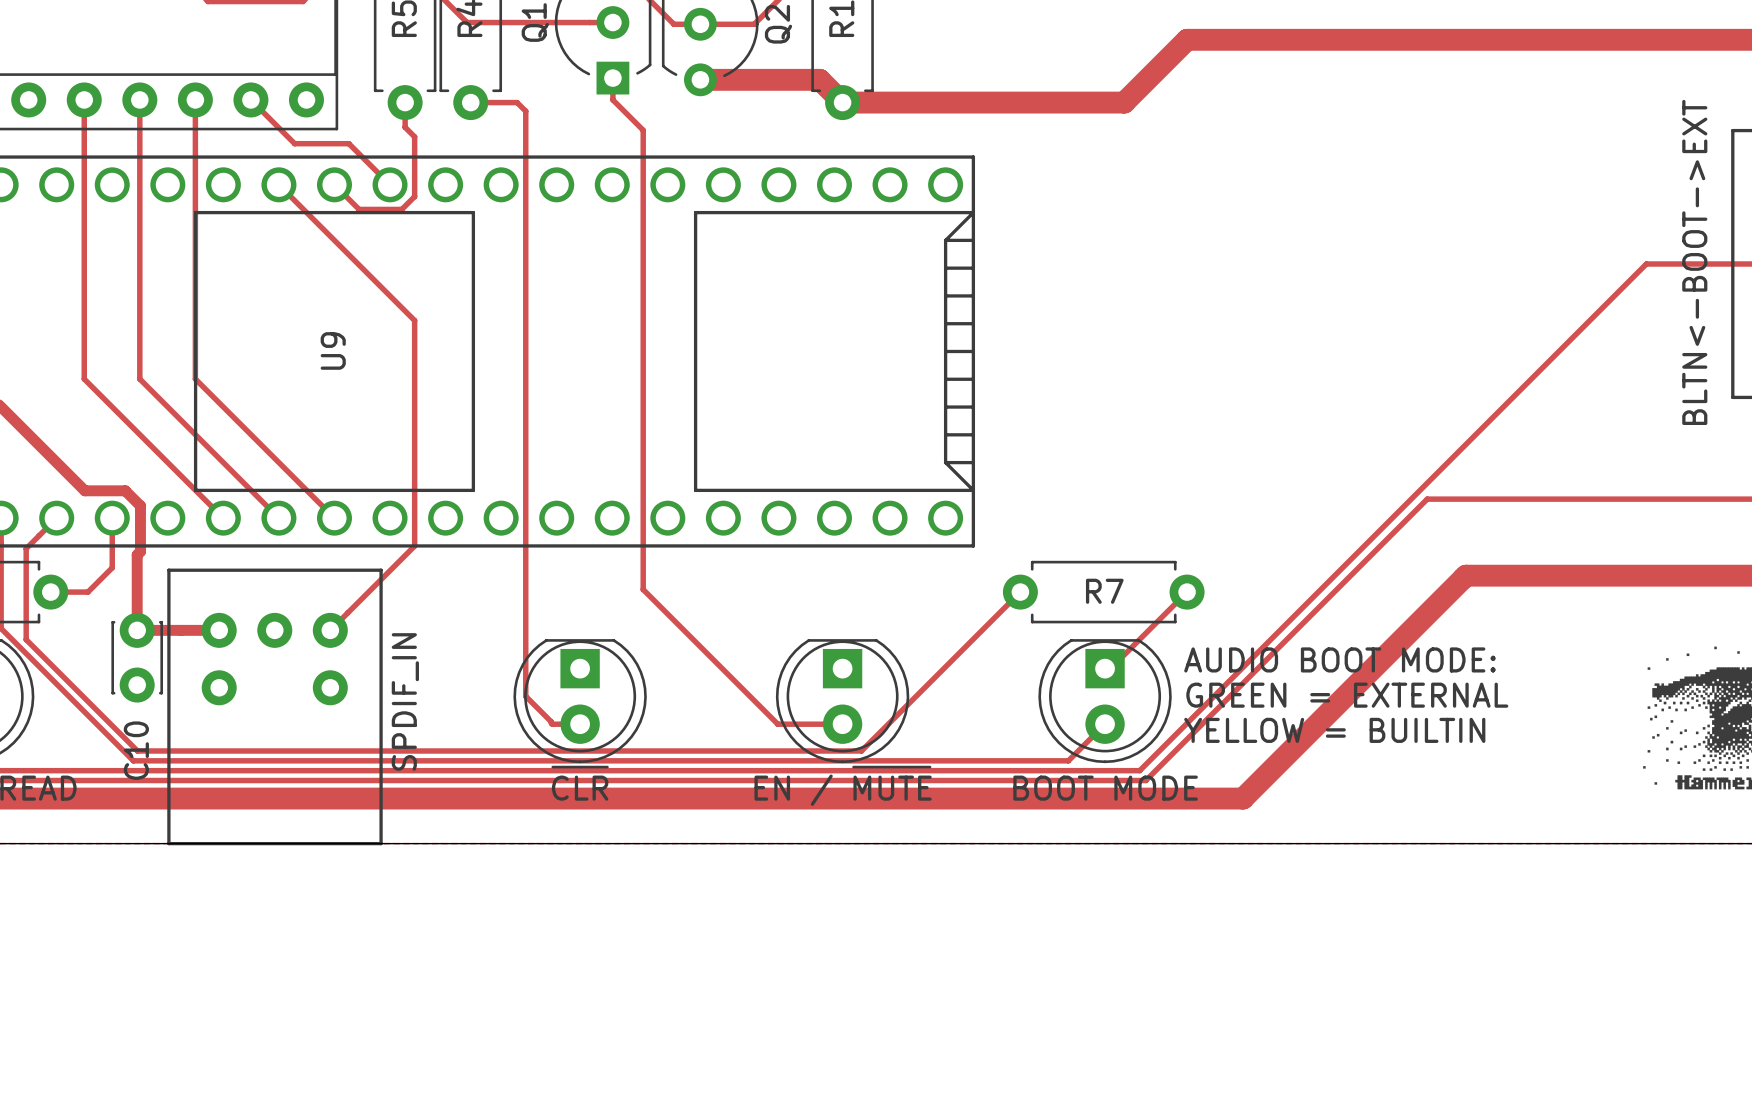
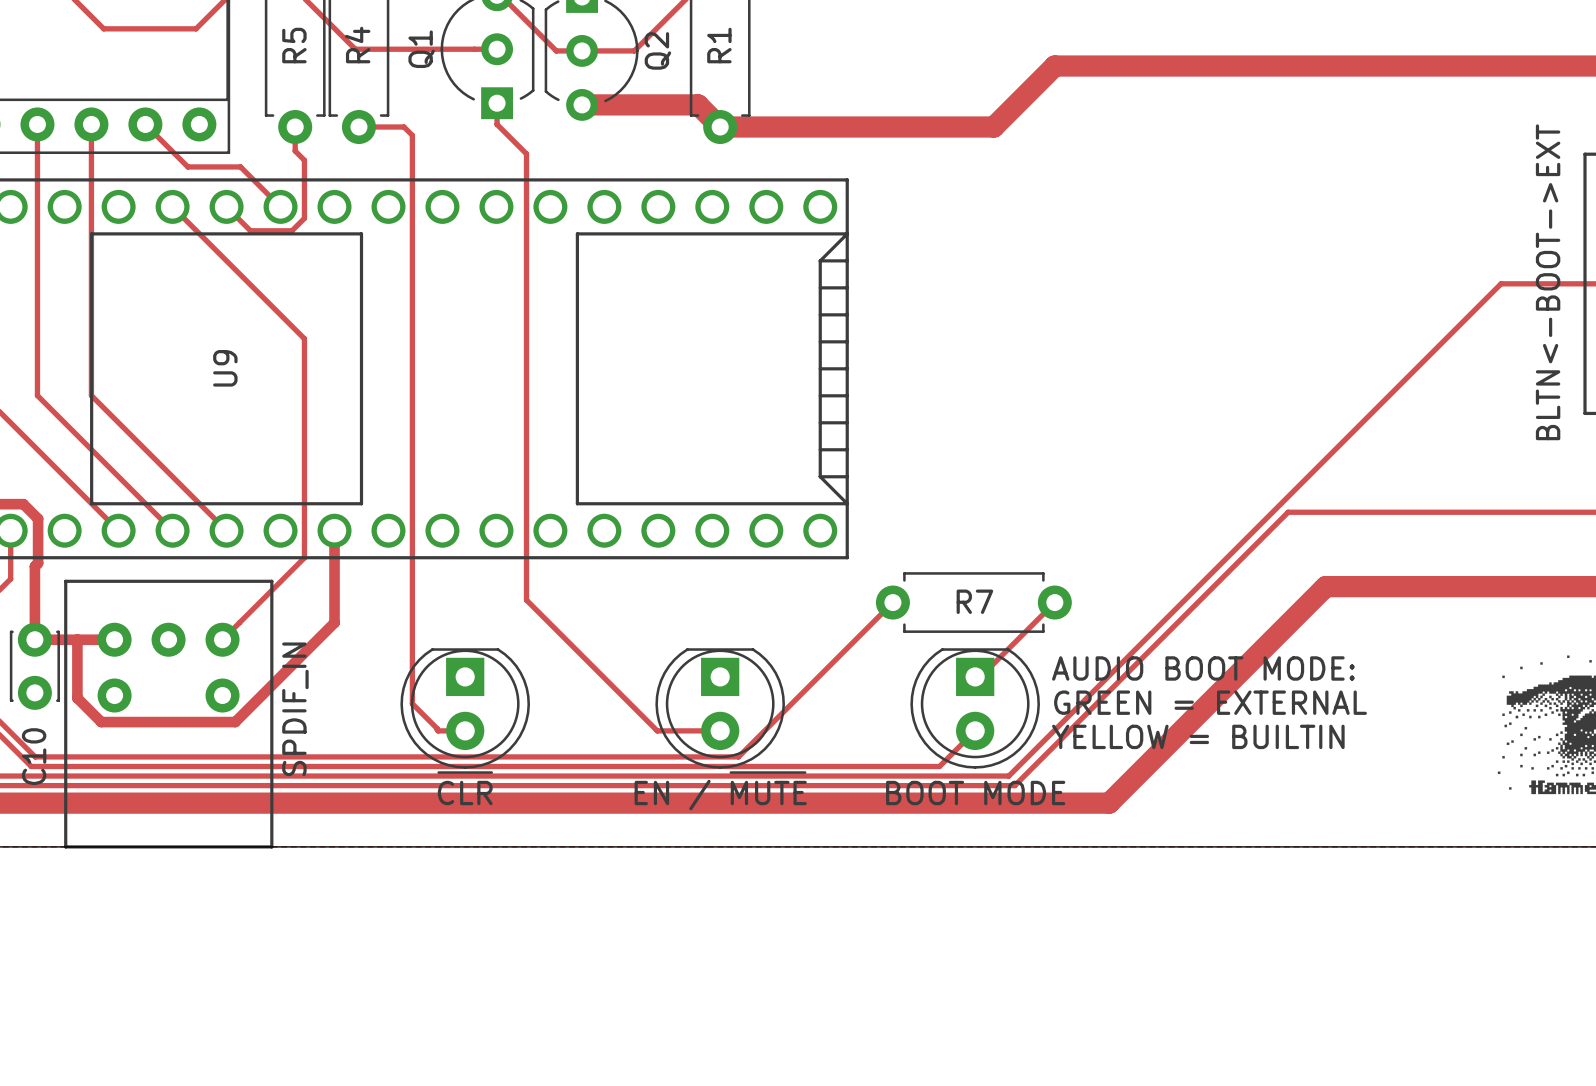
track: none -> (334, 530) (334, 622) (235, 722) (101, 722) (77, 698) (77, 639)

